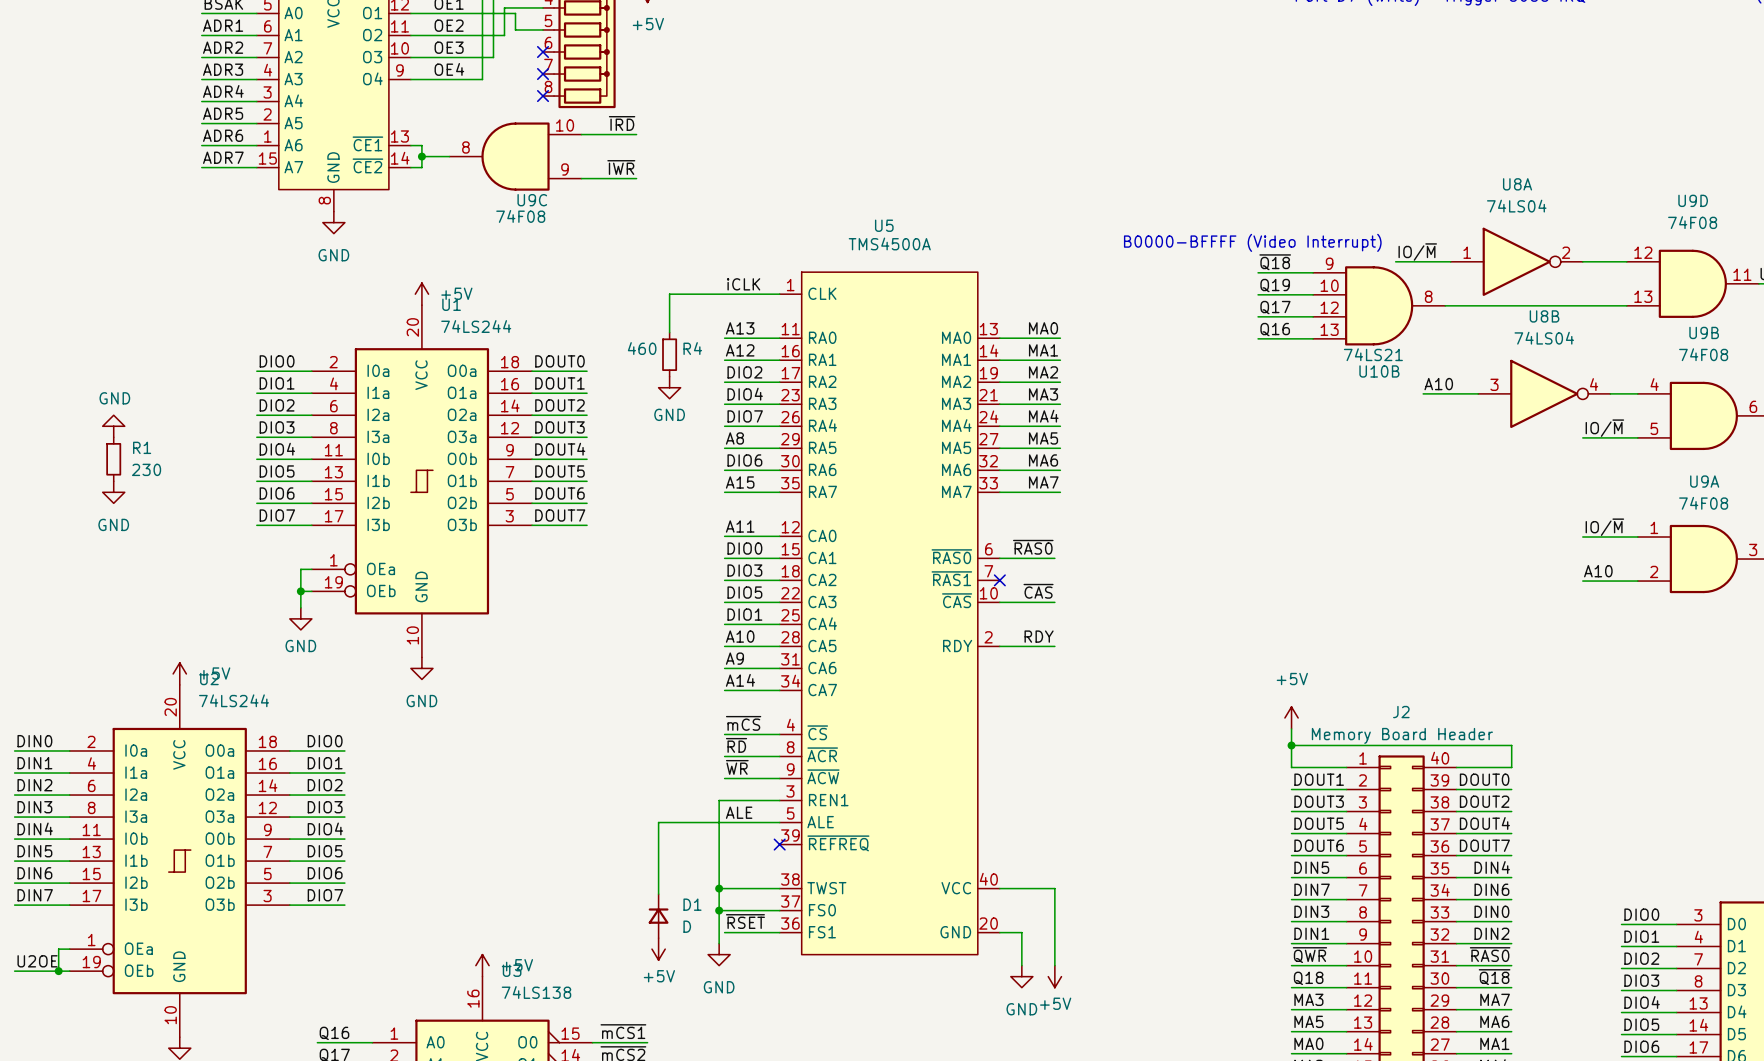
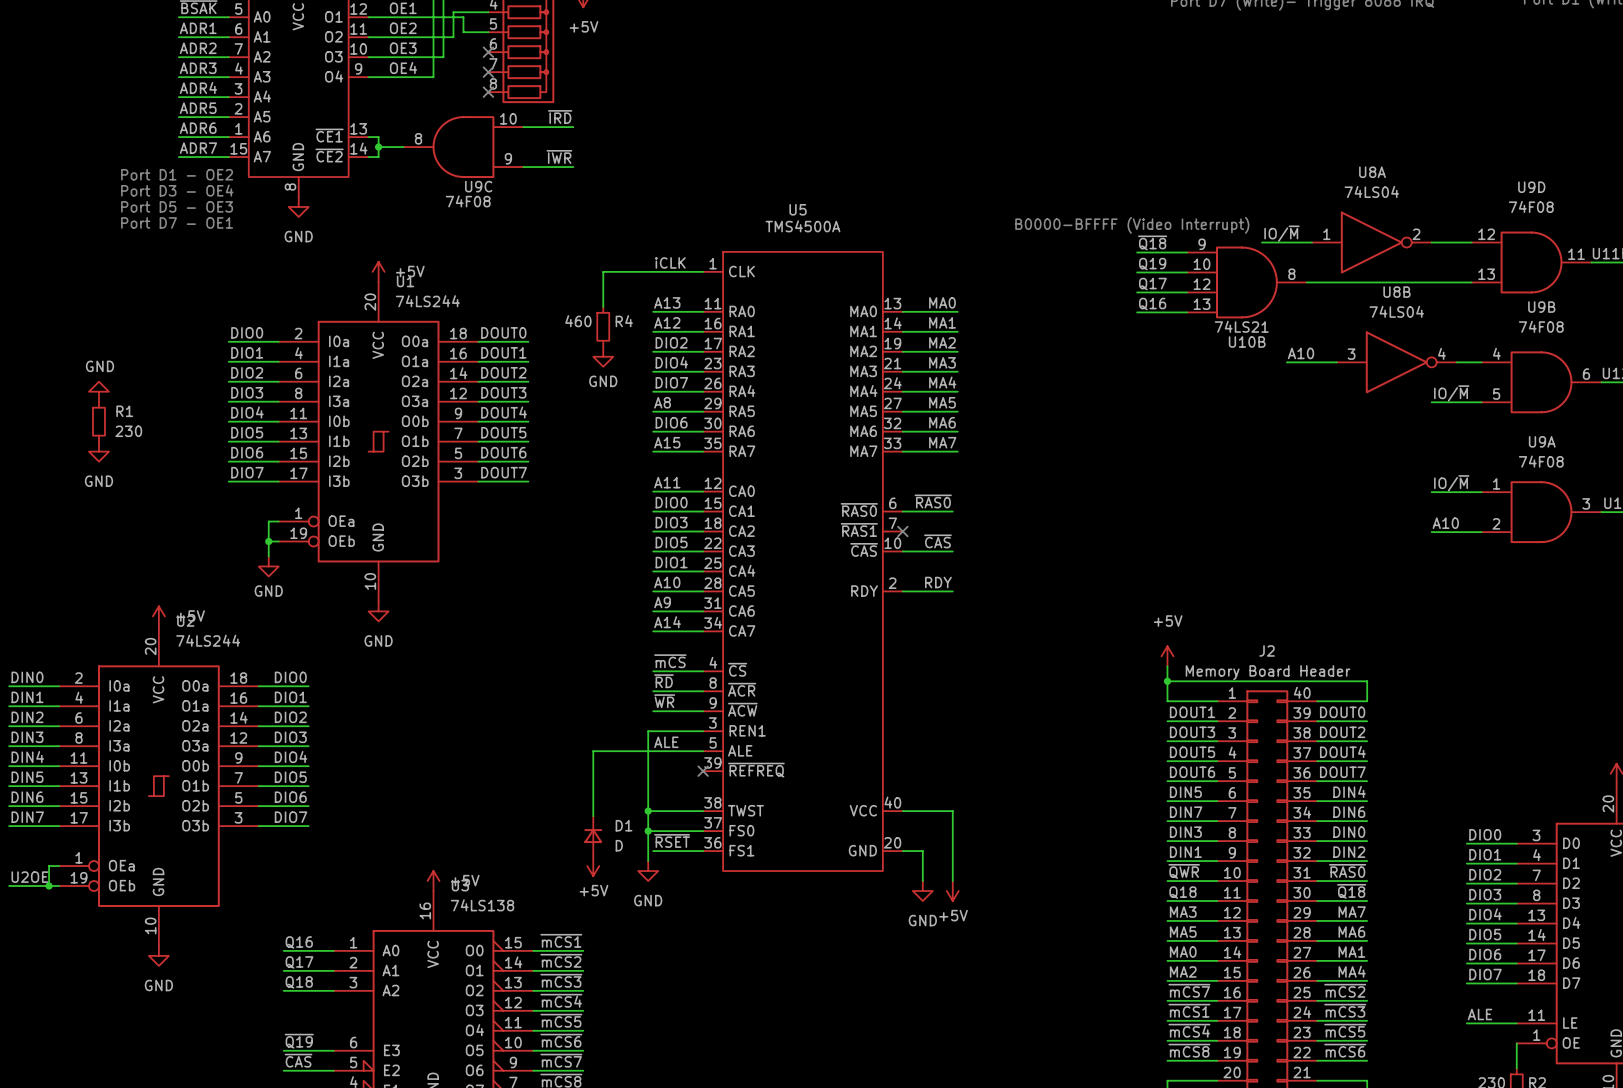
text: none -> Port D1 - OE2 (177, 174)
text: none -> Port D3 - OE4 (177, 190)
text: none -> Port D5 - OE3 (177, 206)
text: none -> Port D7 - OE1 (177, 222)

